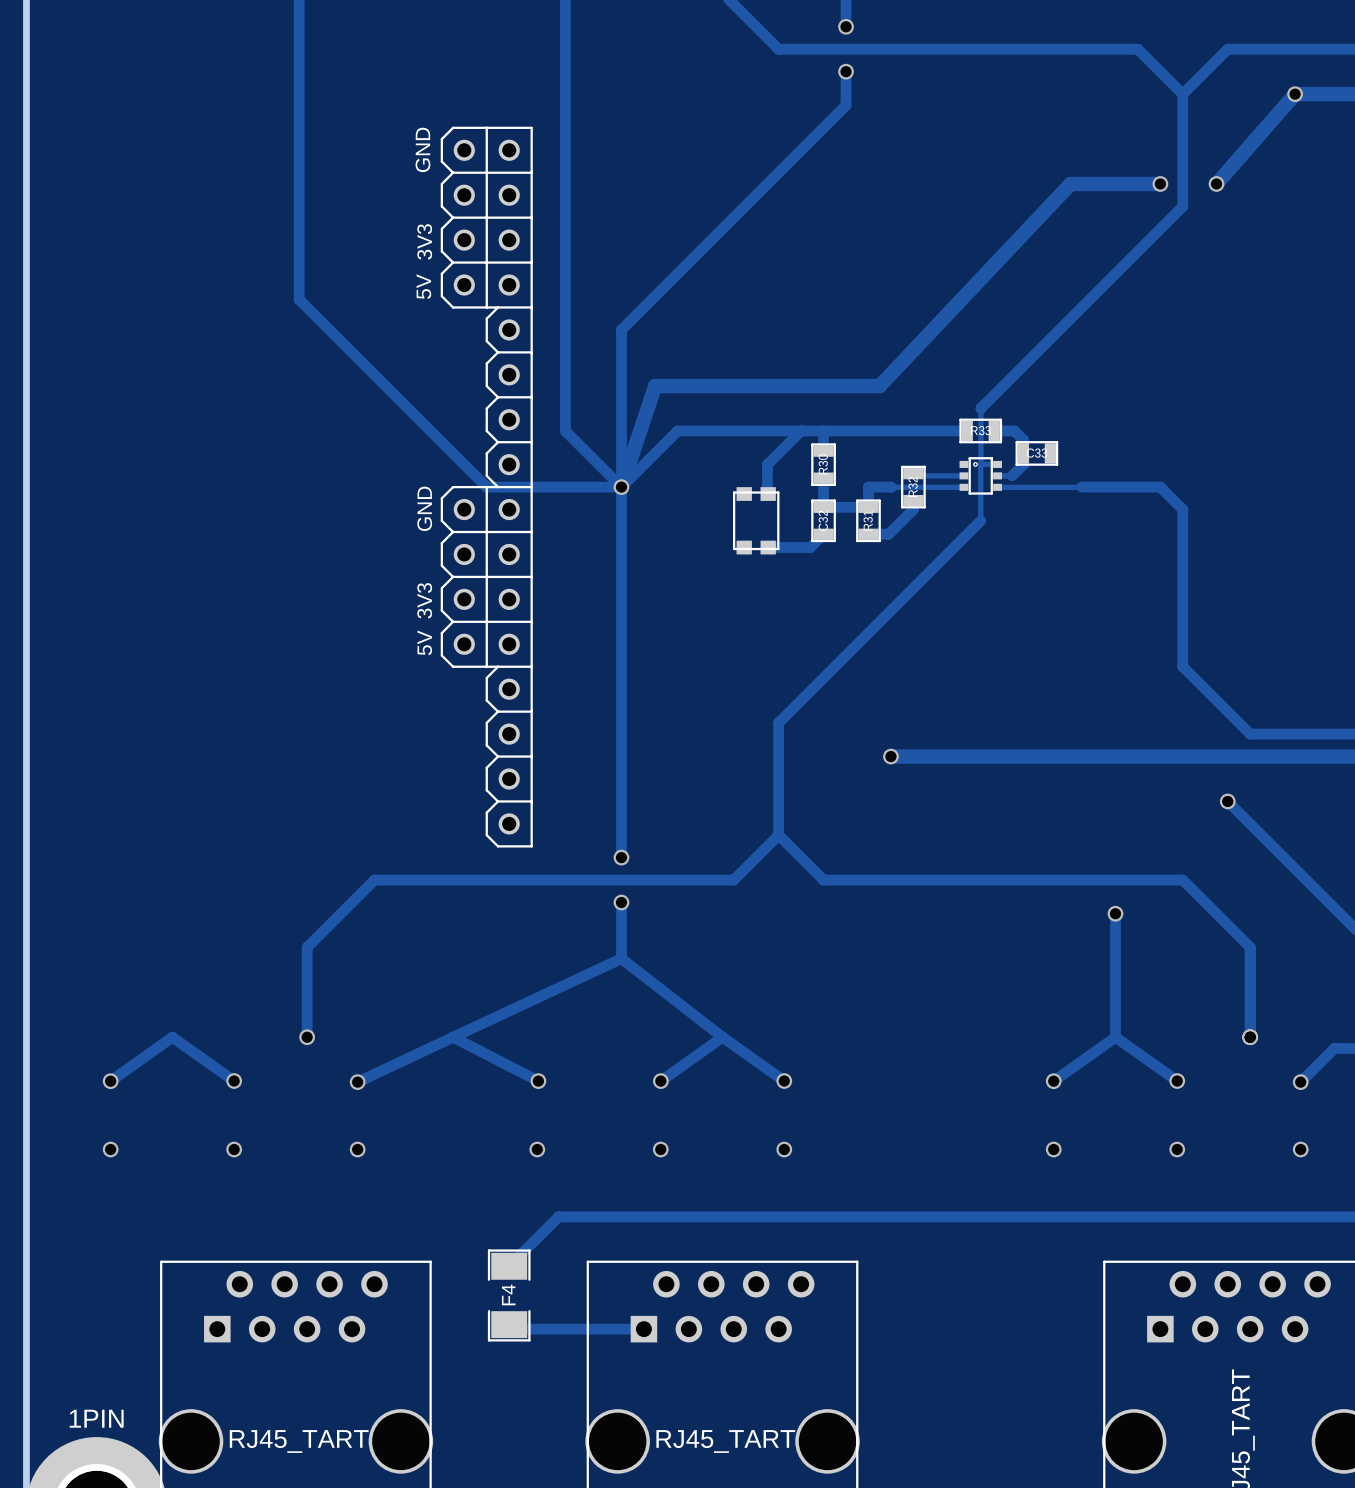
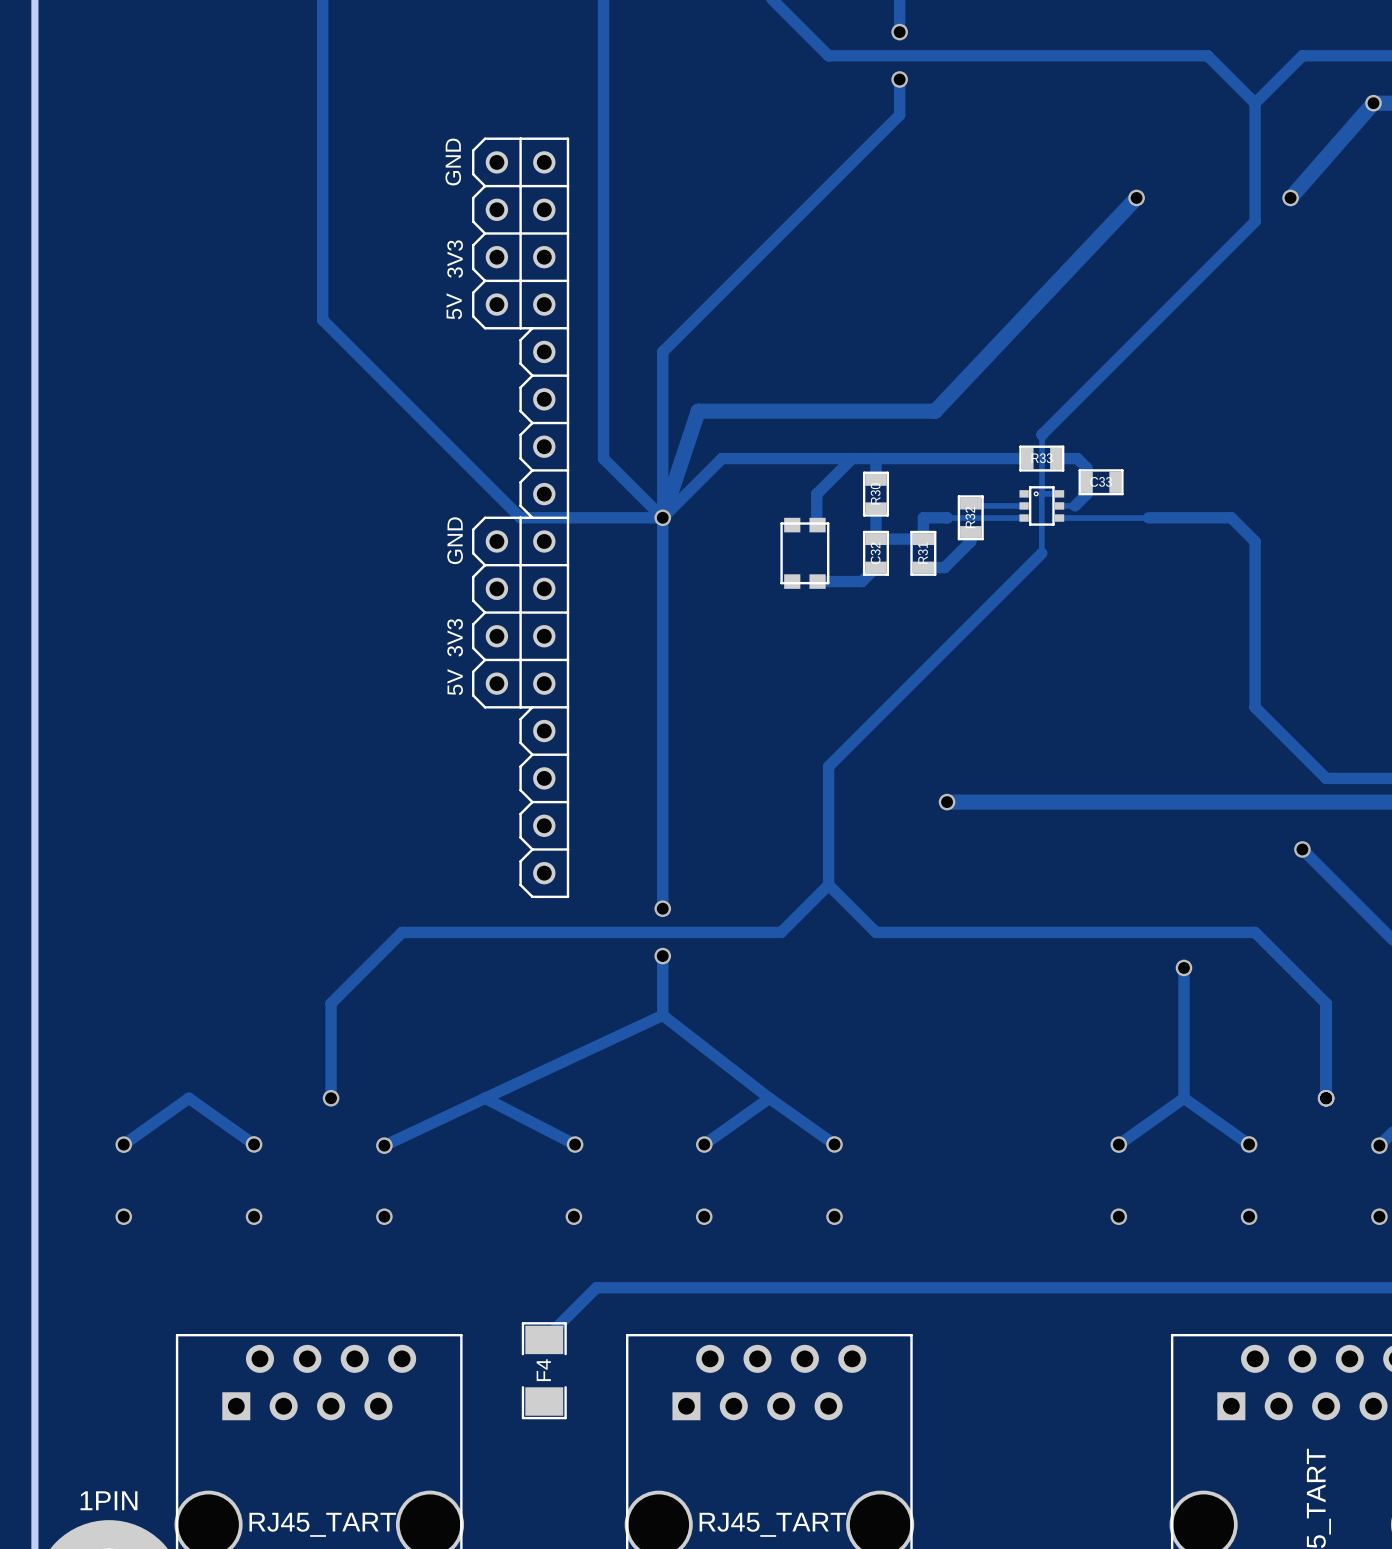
track: (1070, 183) (1160, 183) -> none
via position: (1160, 183) -> (1136, 197)
track: (509, 1324) (513, 1329) (643, 1329) -> none

